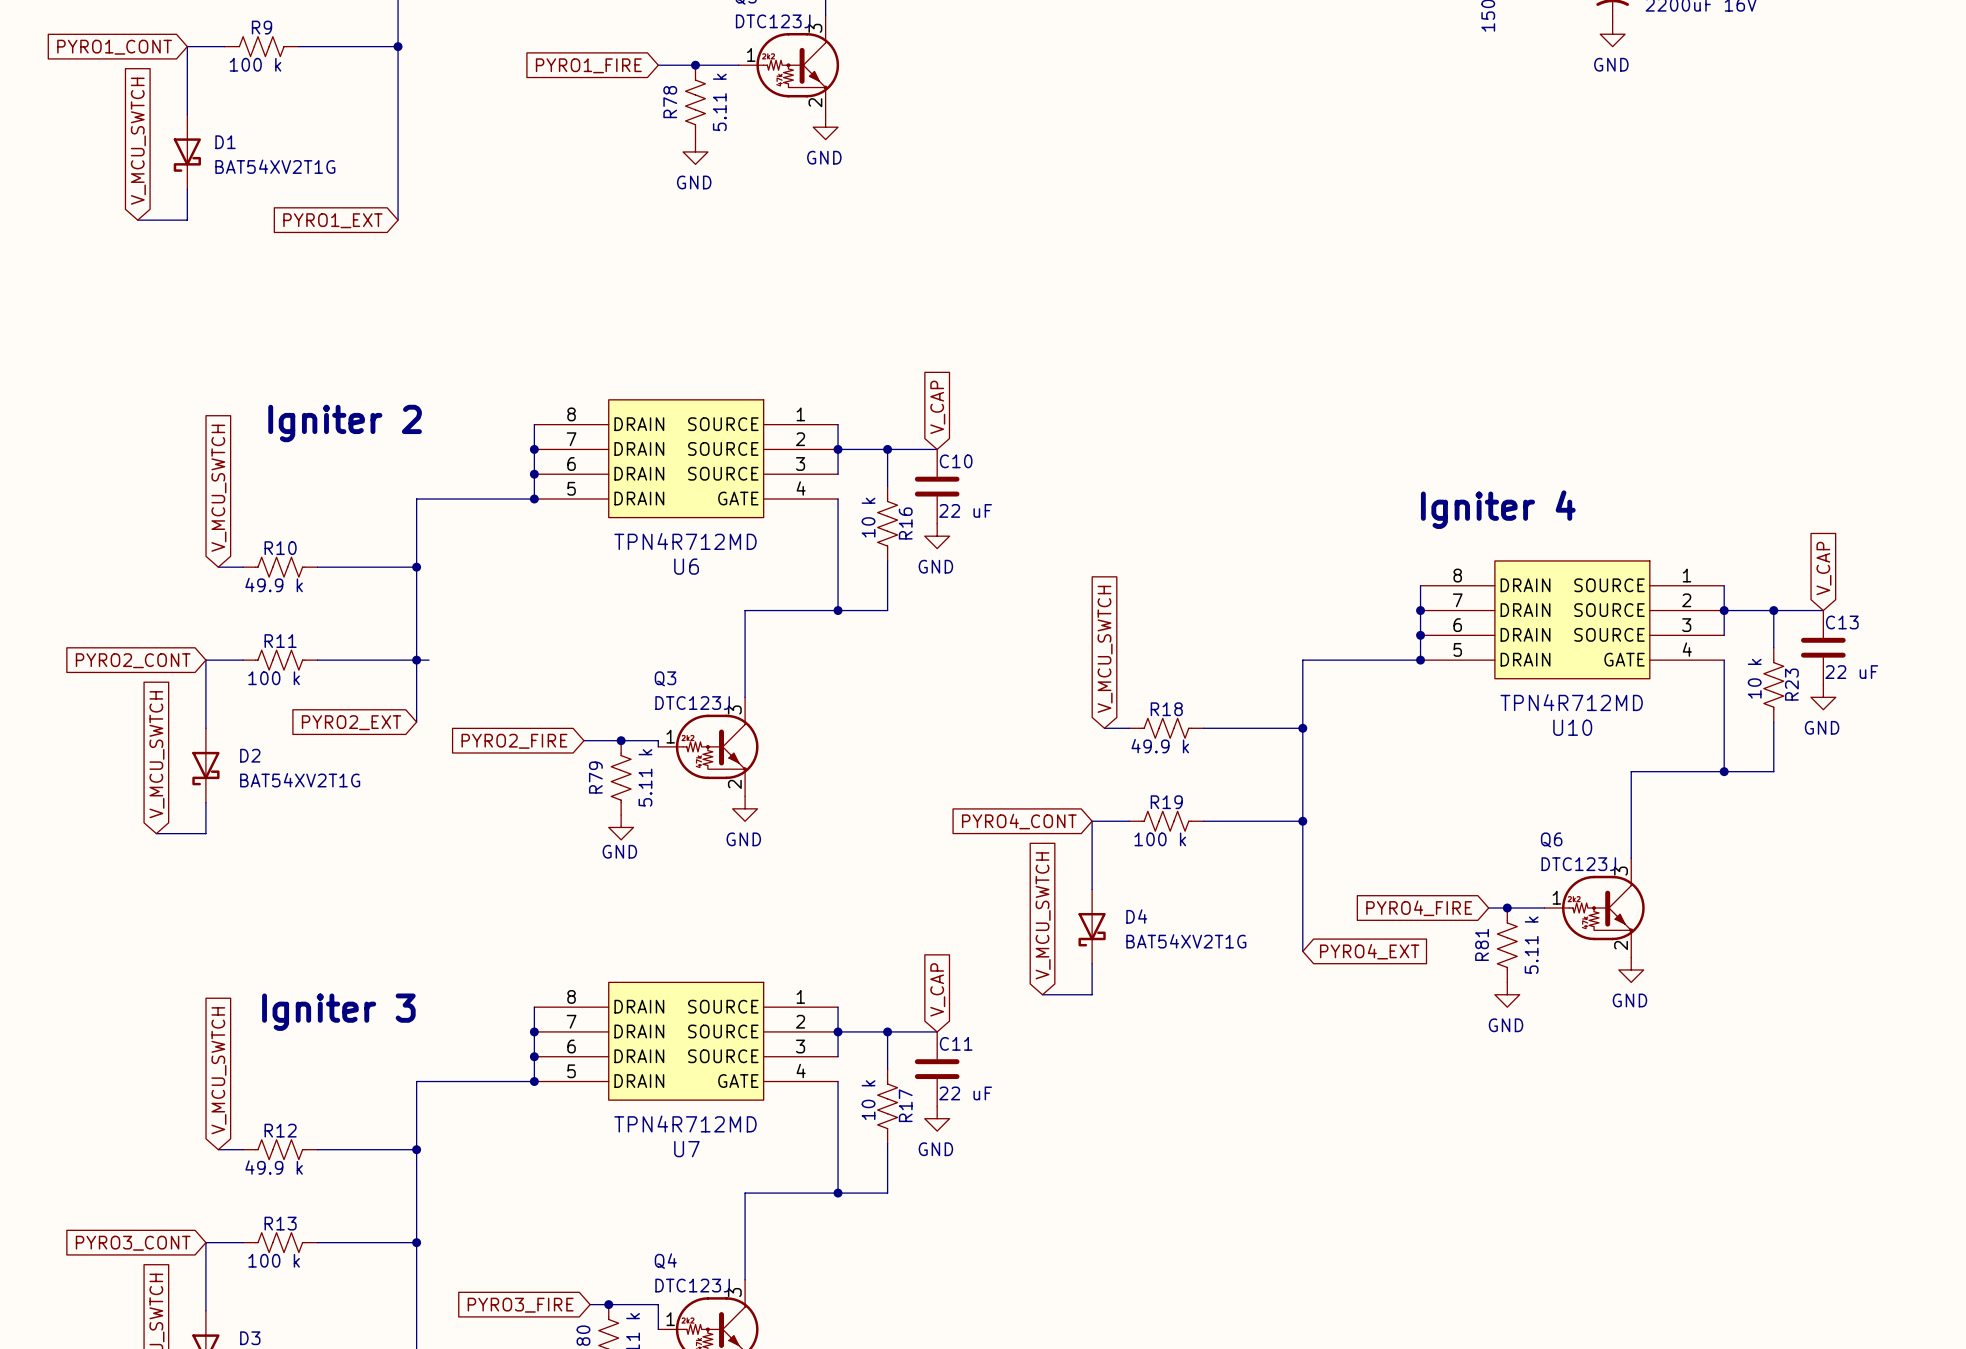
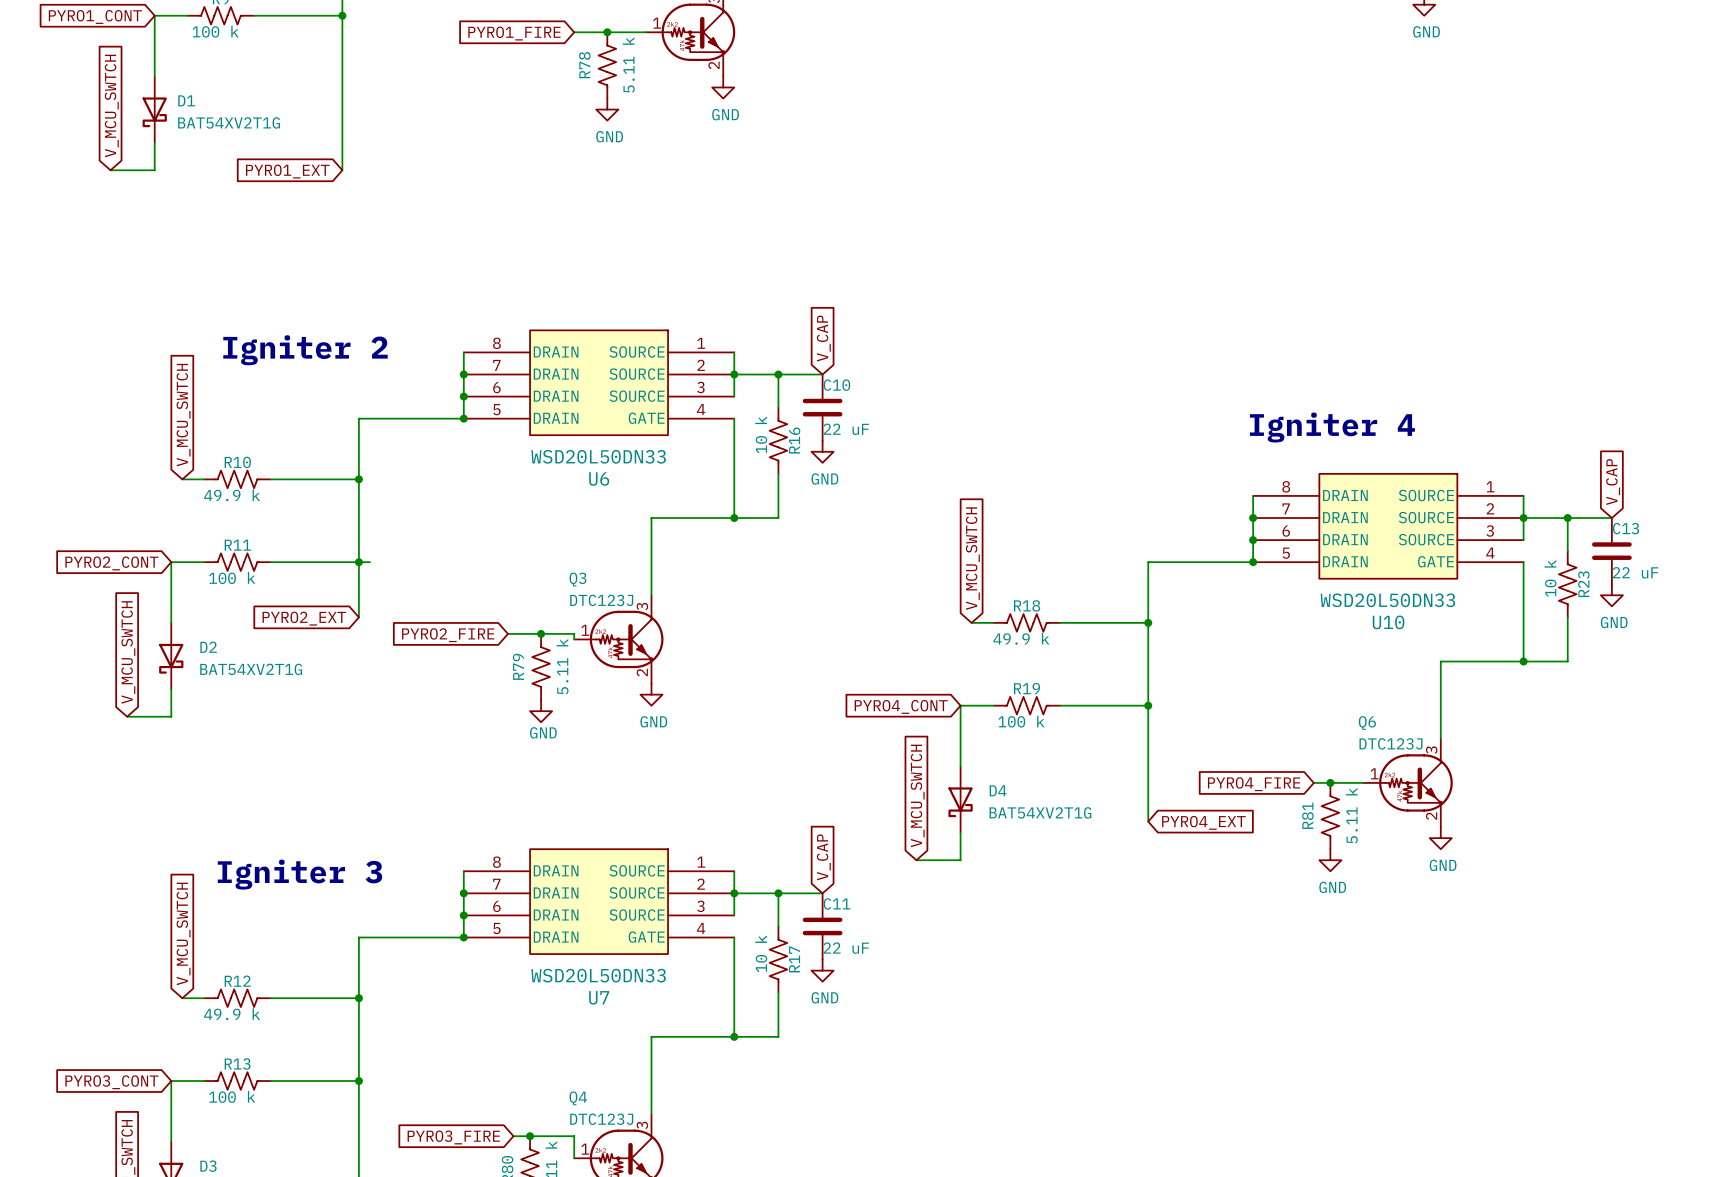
U6 value: TPN4R712MD (685, 541) -> WSD20L50DN33 (598, 456)
U10 value: TPN4R712MD (1571, 702) -> WSD20L50DN33 (1387, 600)
U7 value: TPN4R712MD (685, 1123) -> WSD20L50DN33 (598, 975)

